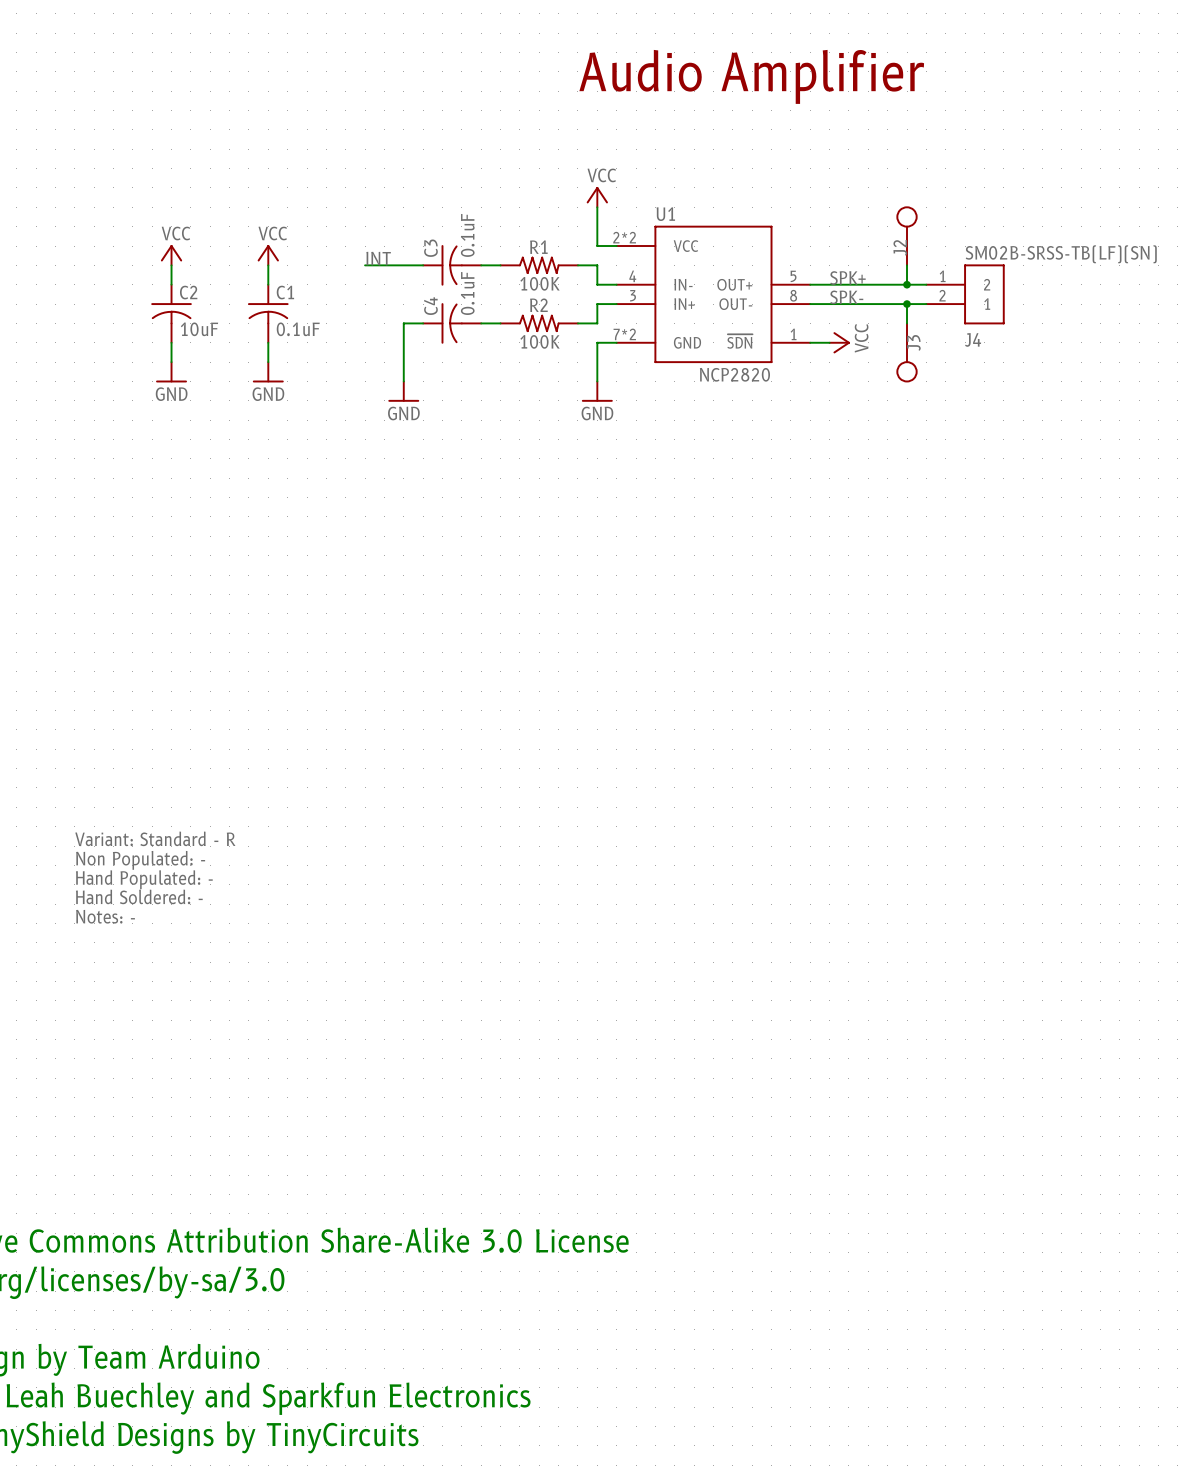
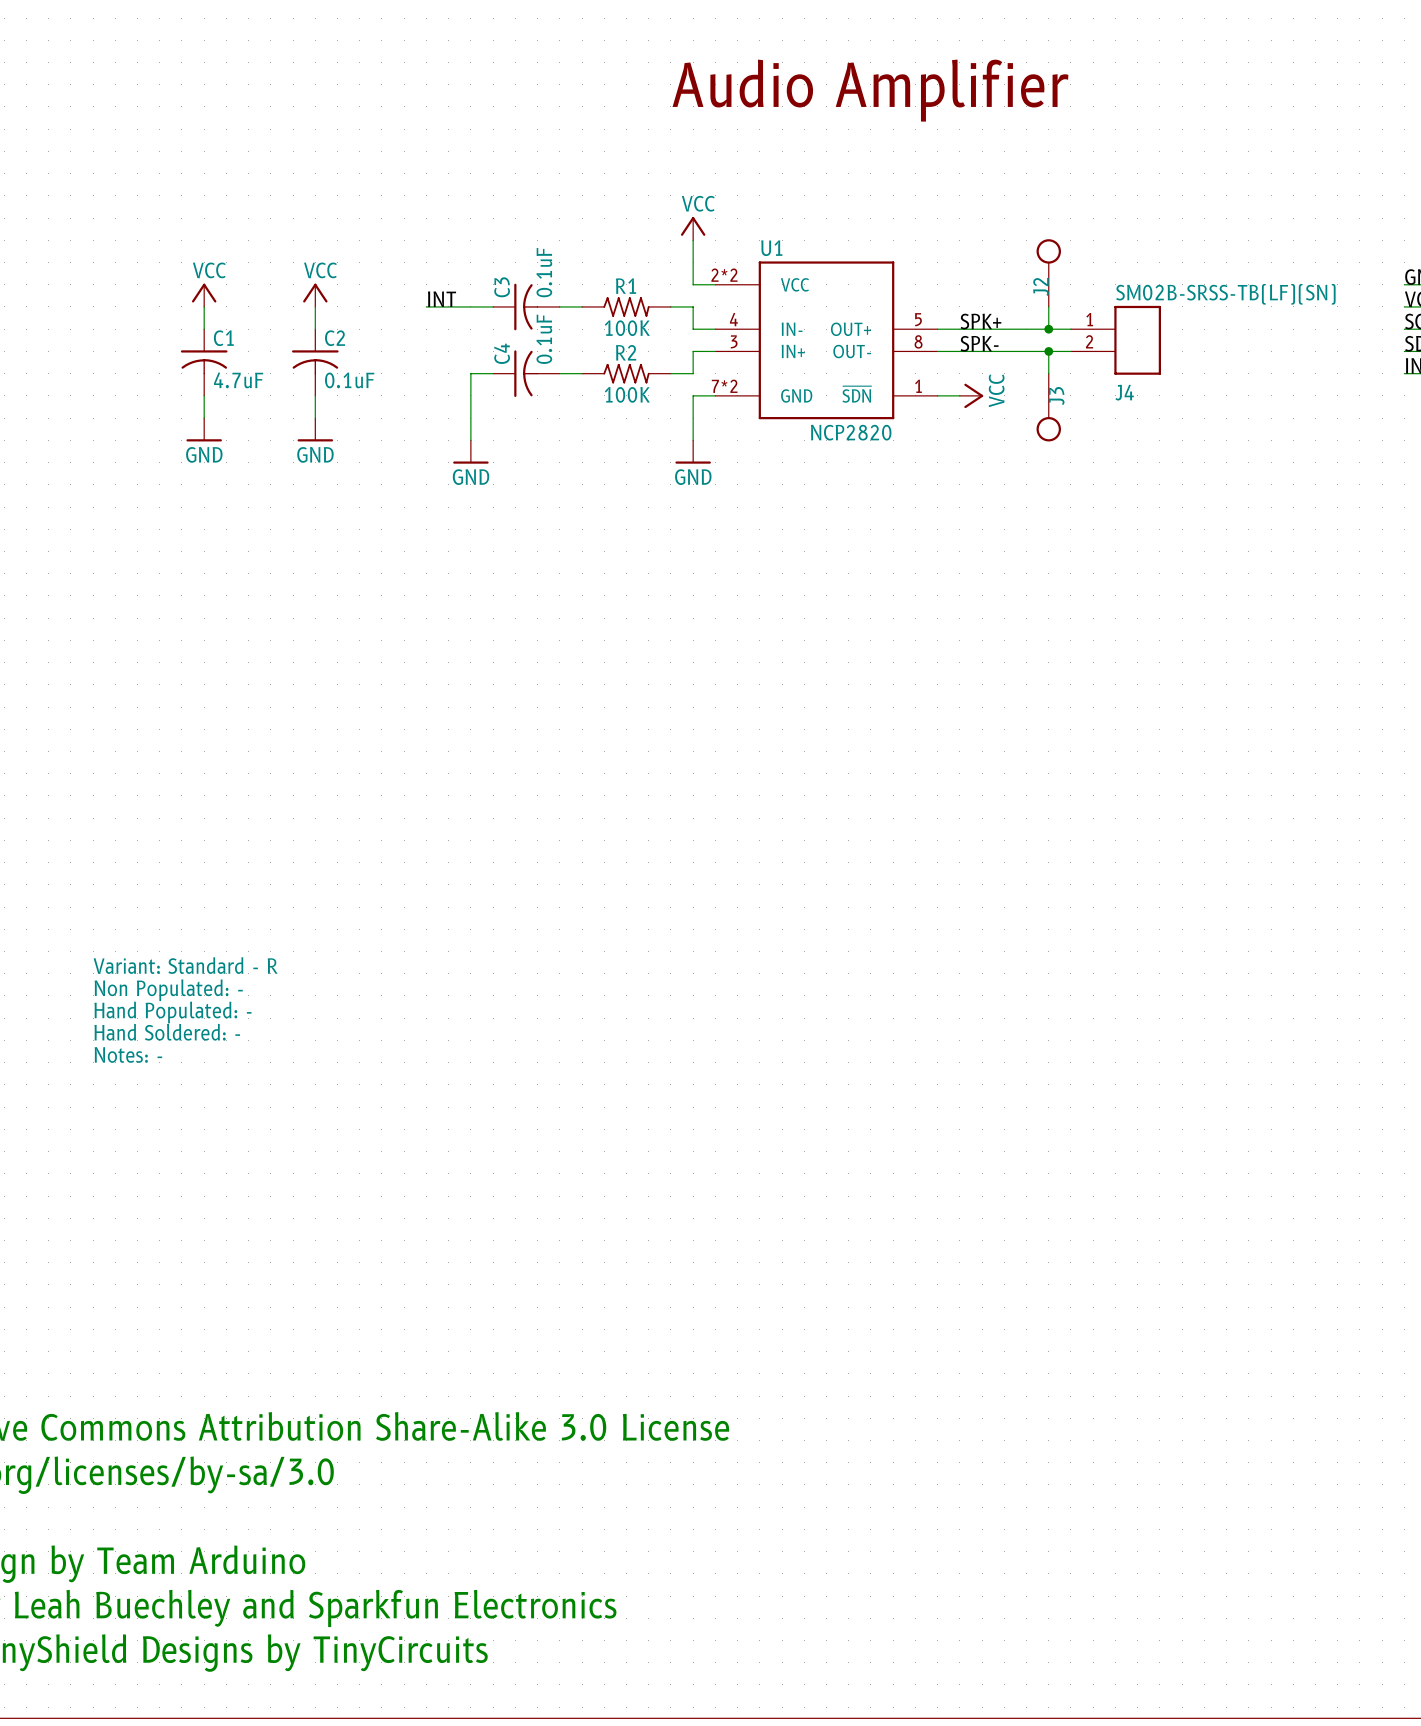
J4 pin name: 2 (987, 284) -> none
C2 name: C2 (188, 292) -> C1 (223, 338)
C1 name: C1 (285, 292) -> C2 (335, 338)
J4 pin name: 1 (987, 304) -> none
C2 value: 10uF (199, 329) -> 4.7uF (238, 380)

